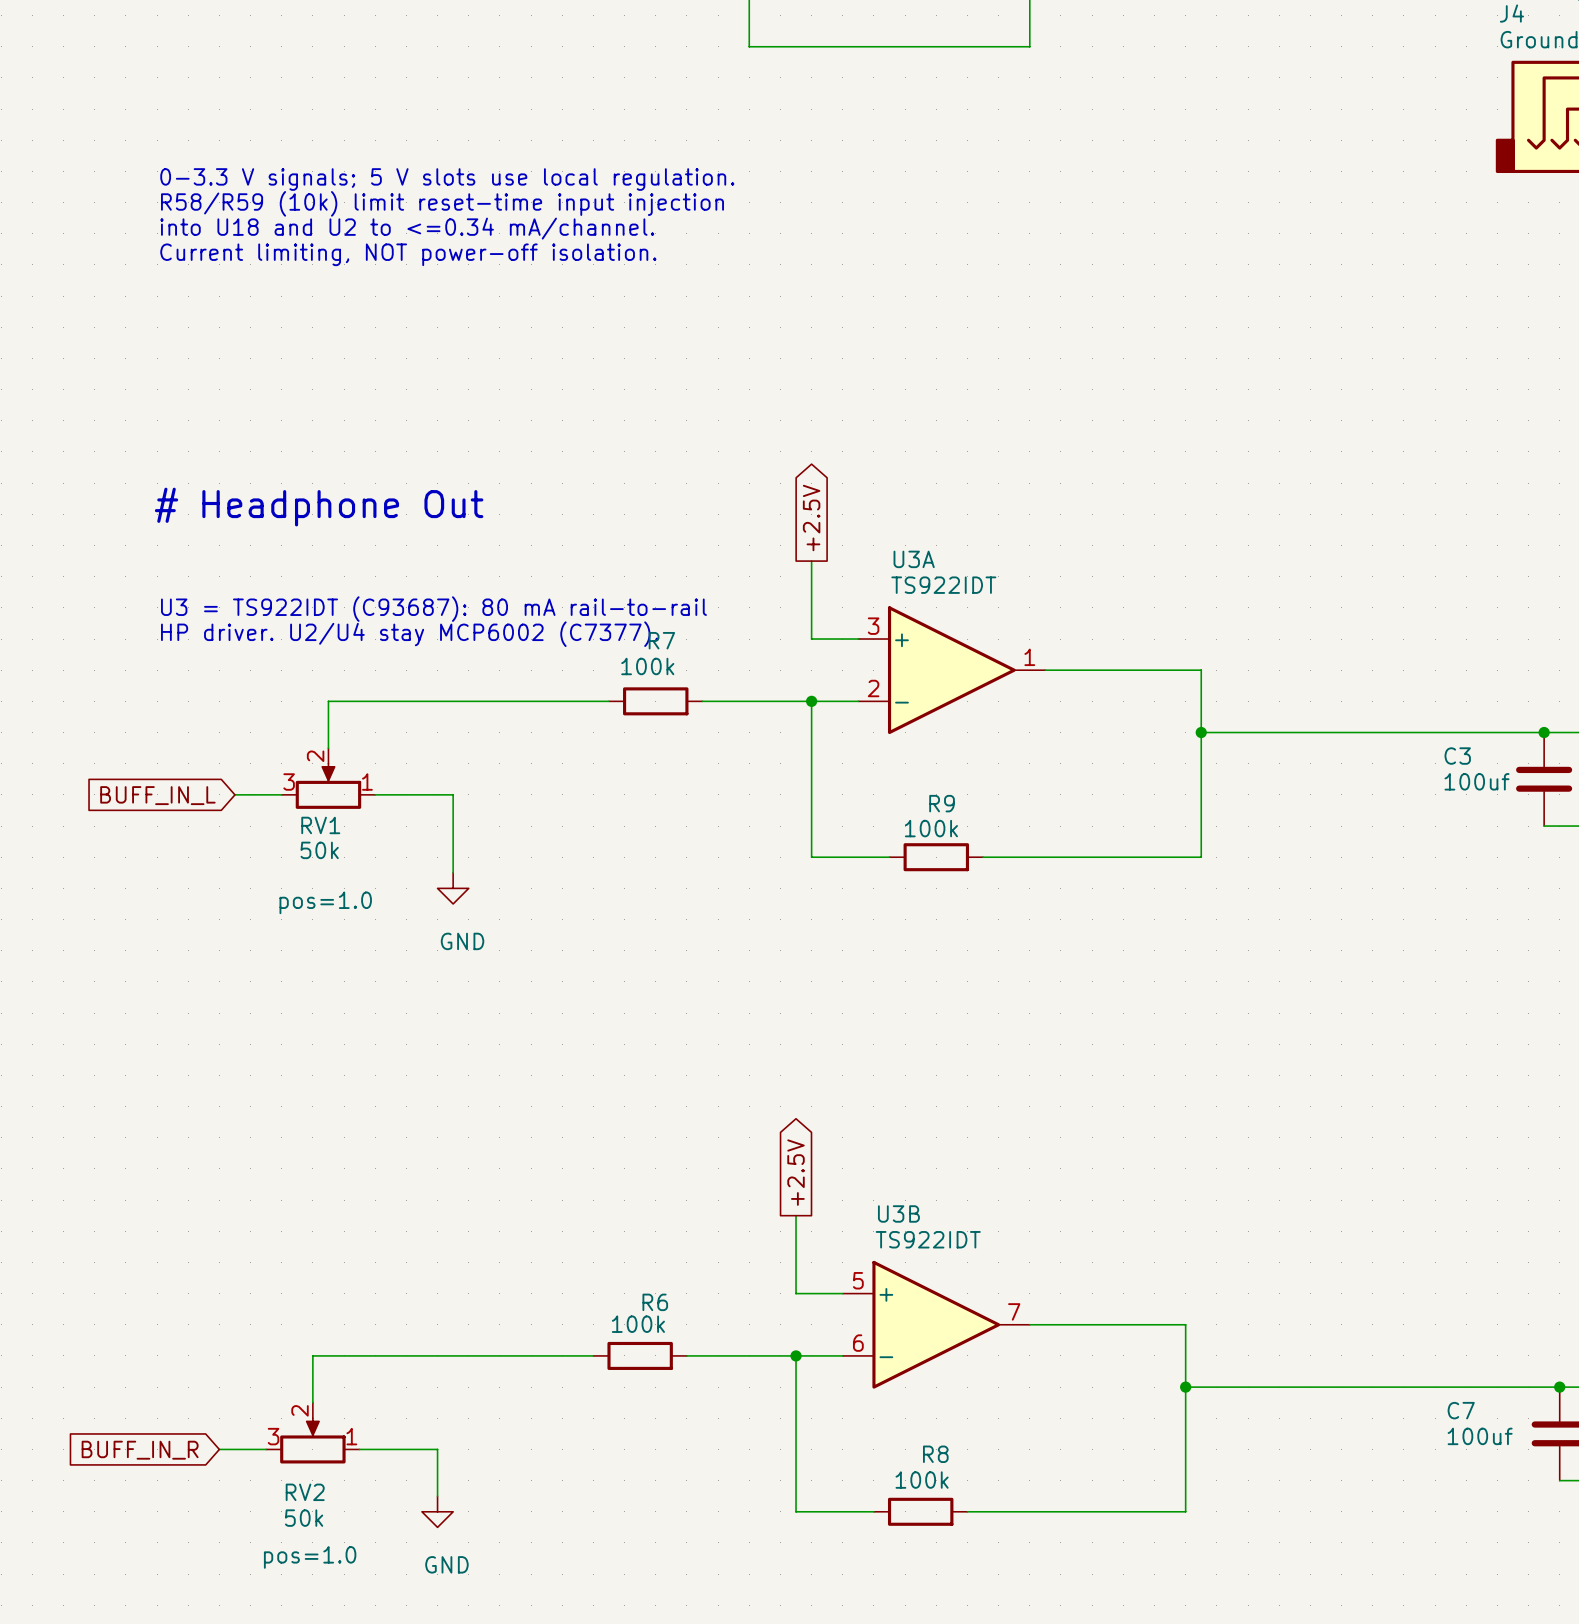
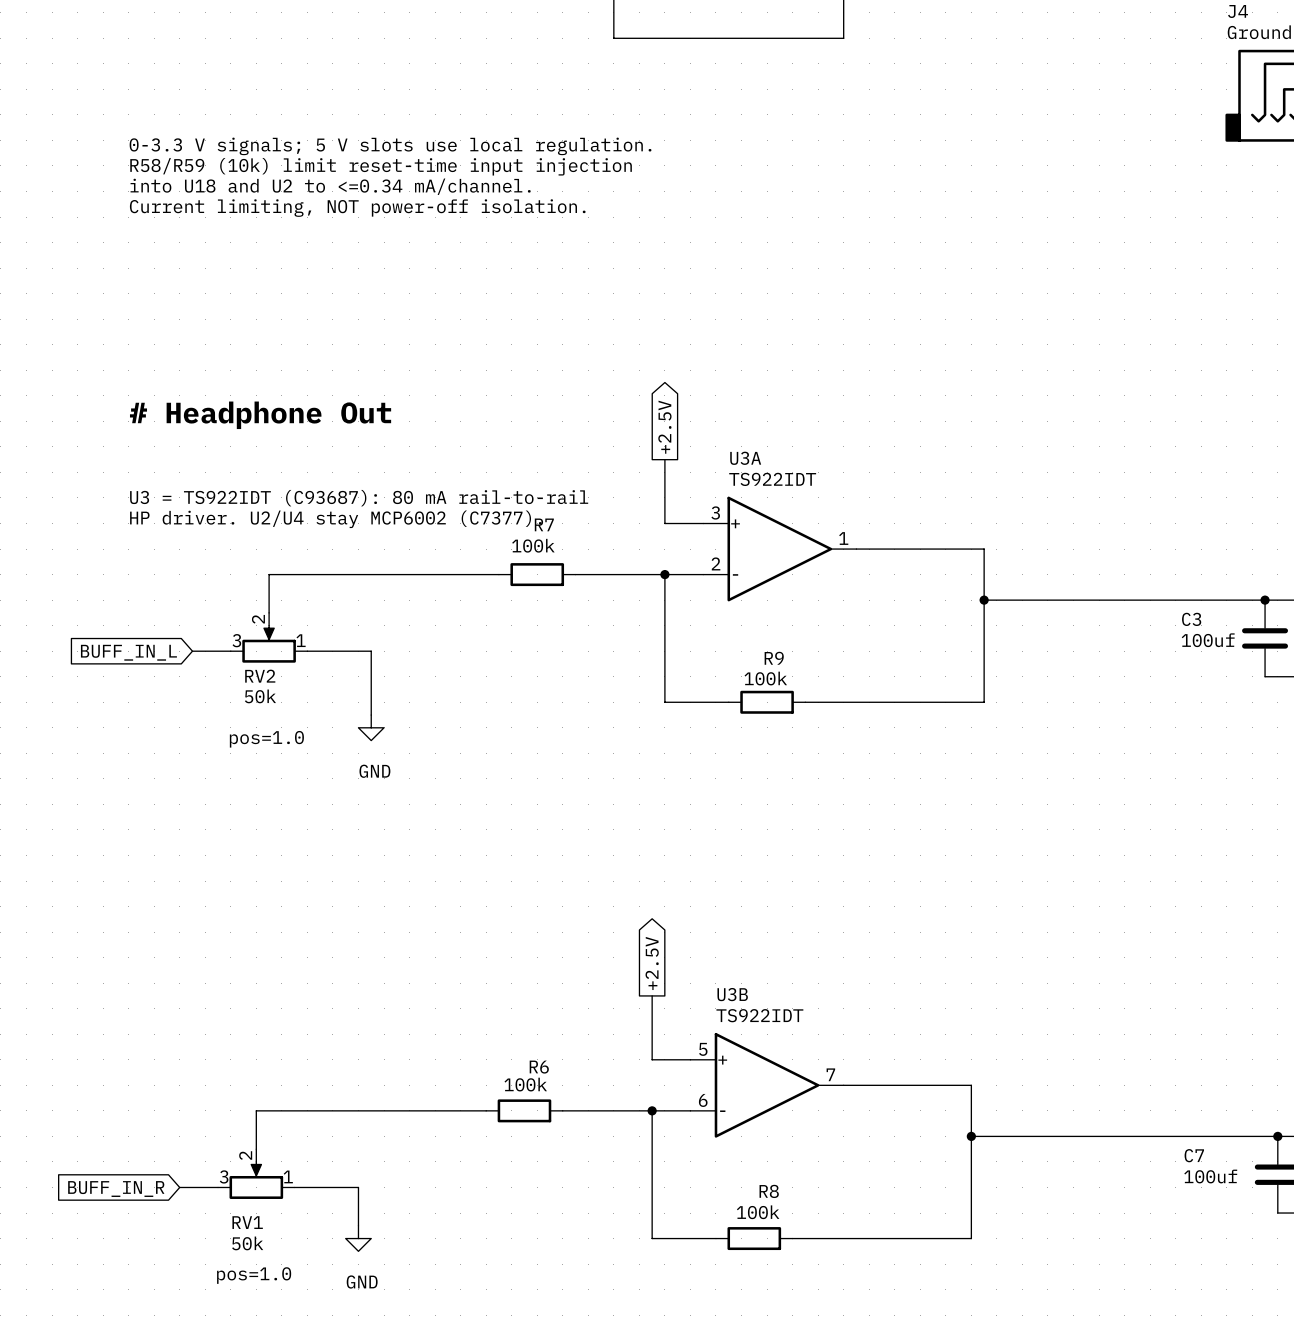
RV1 name: RV1 (320, 825) -> RV2 (260, 676)
RV2 name: RV2 (305, 1492) -> RV1 (247, 1222)

